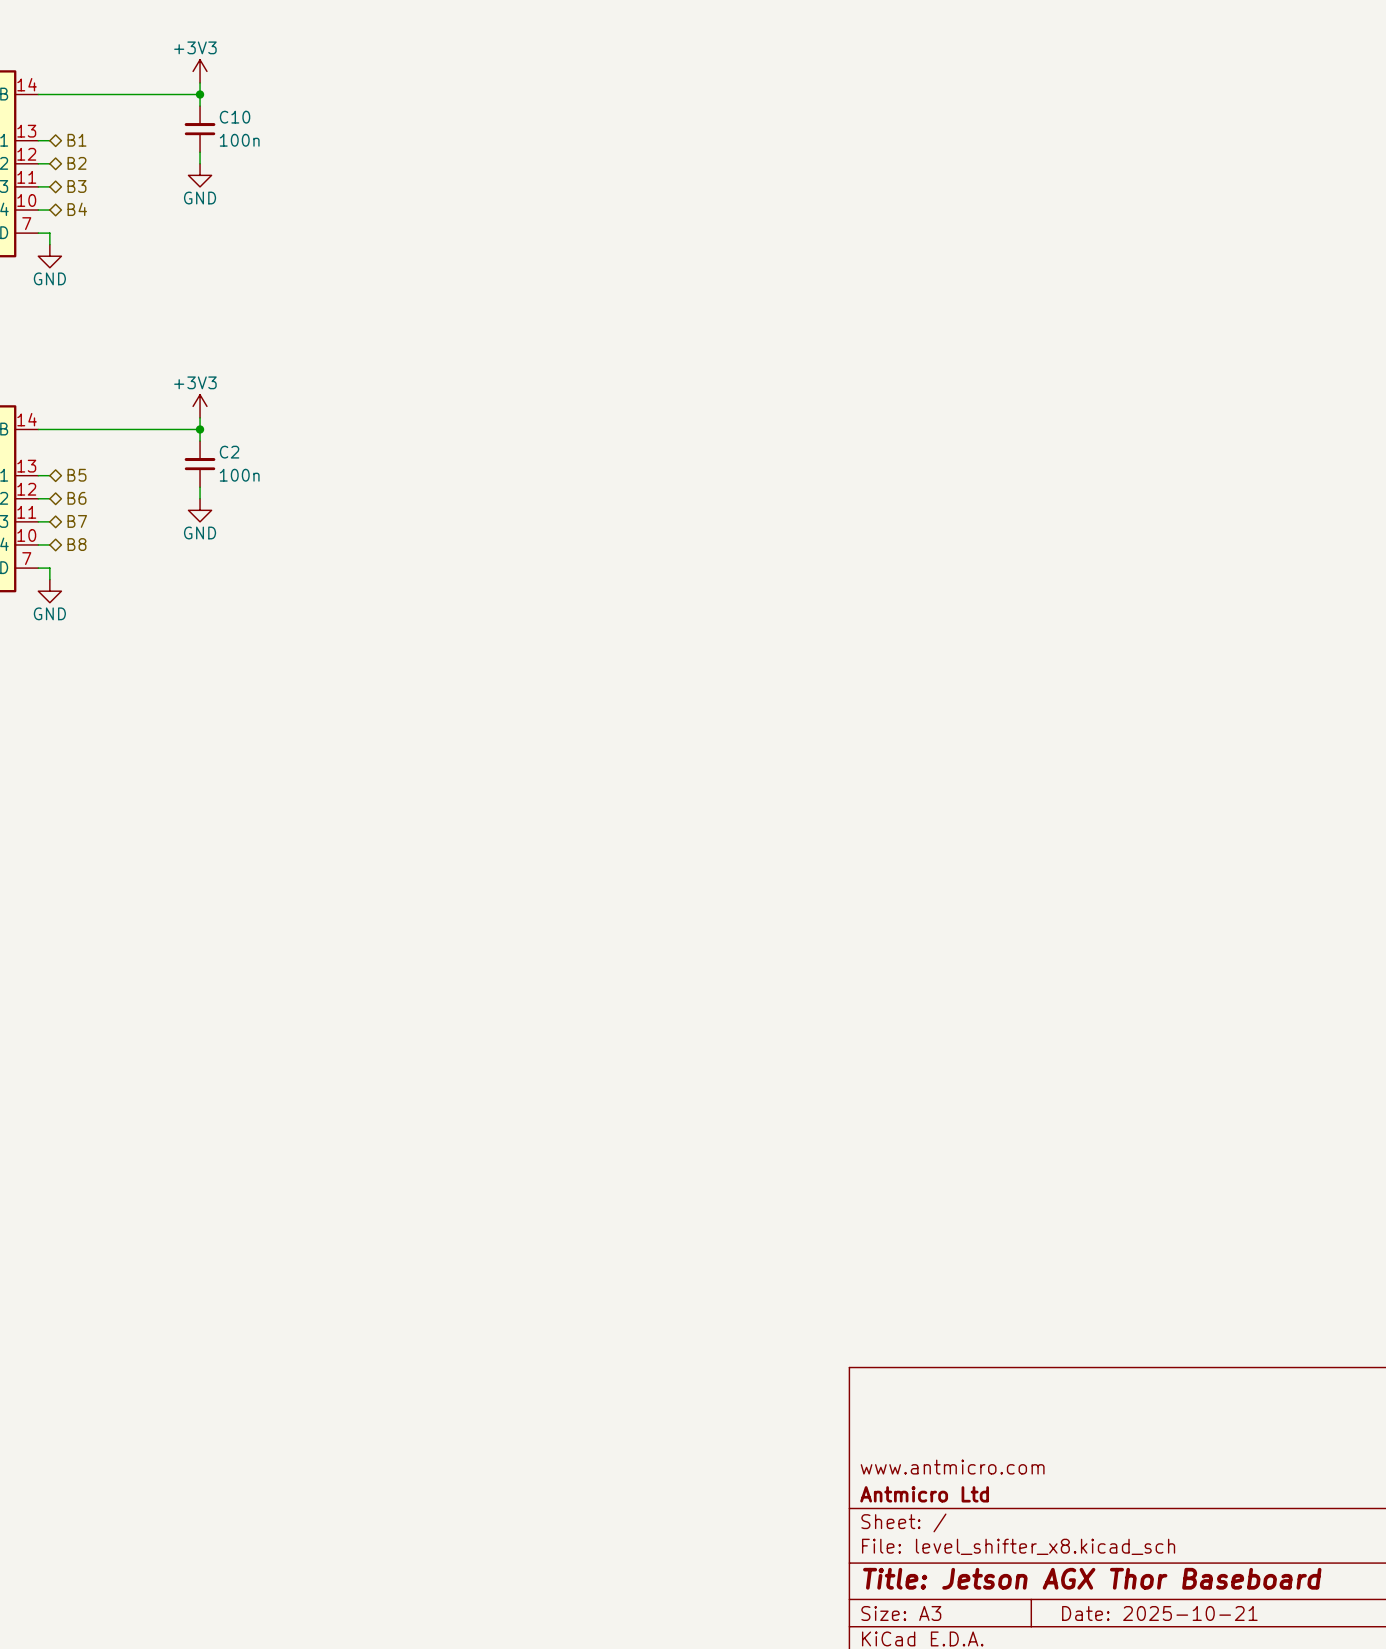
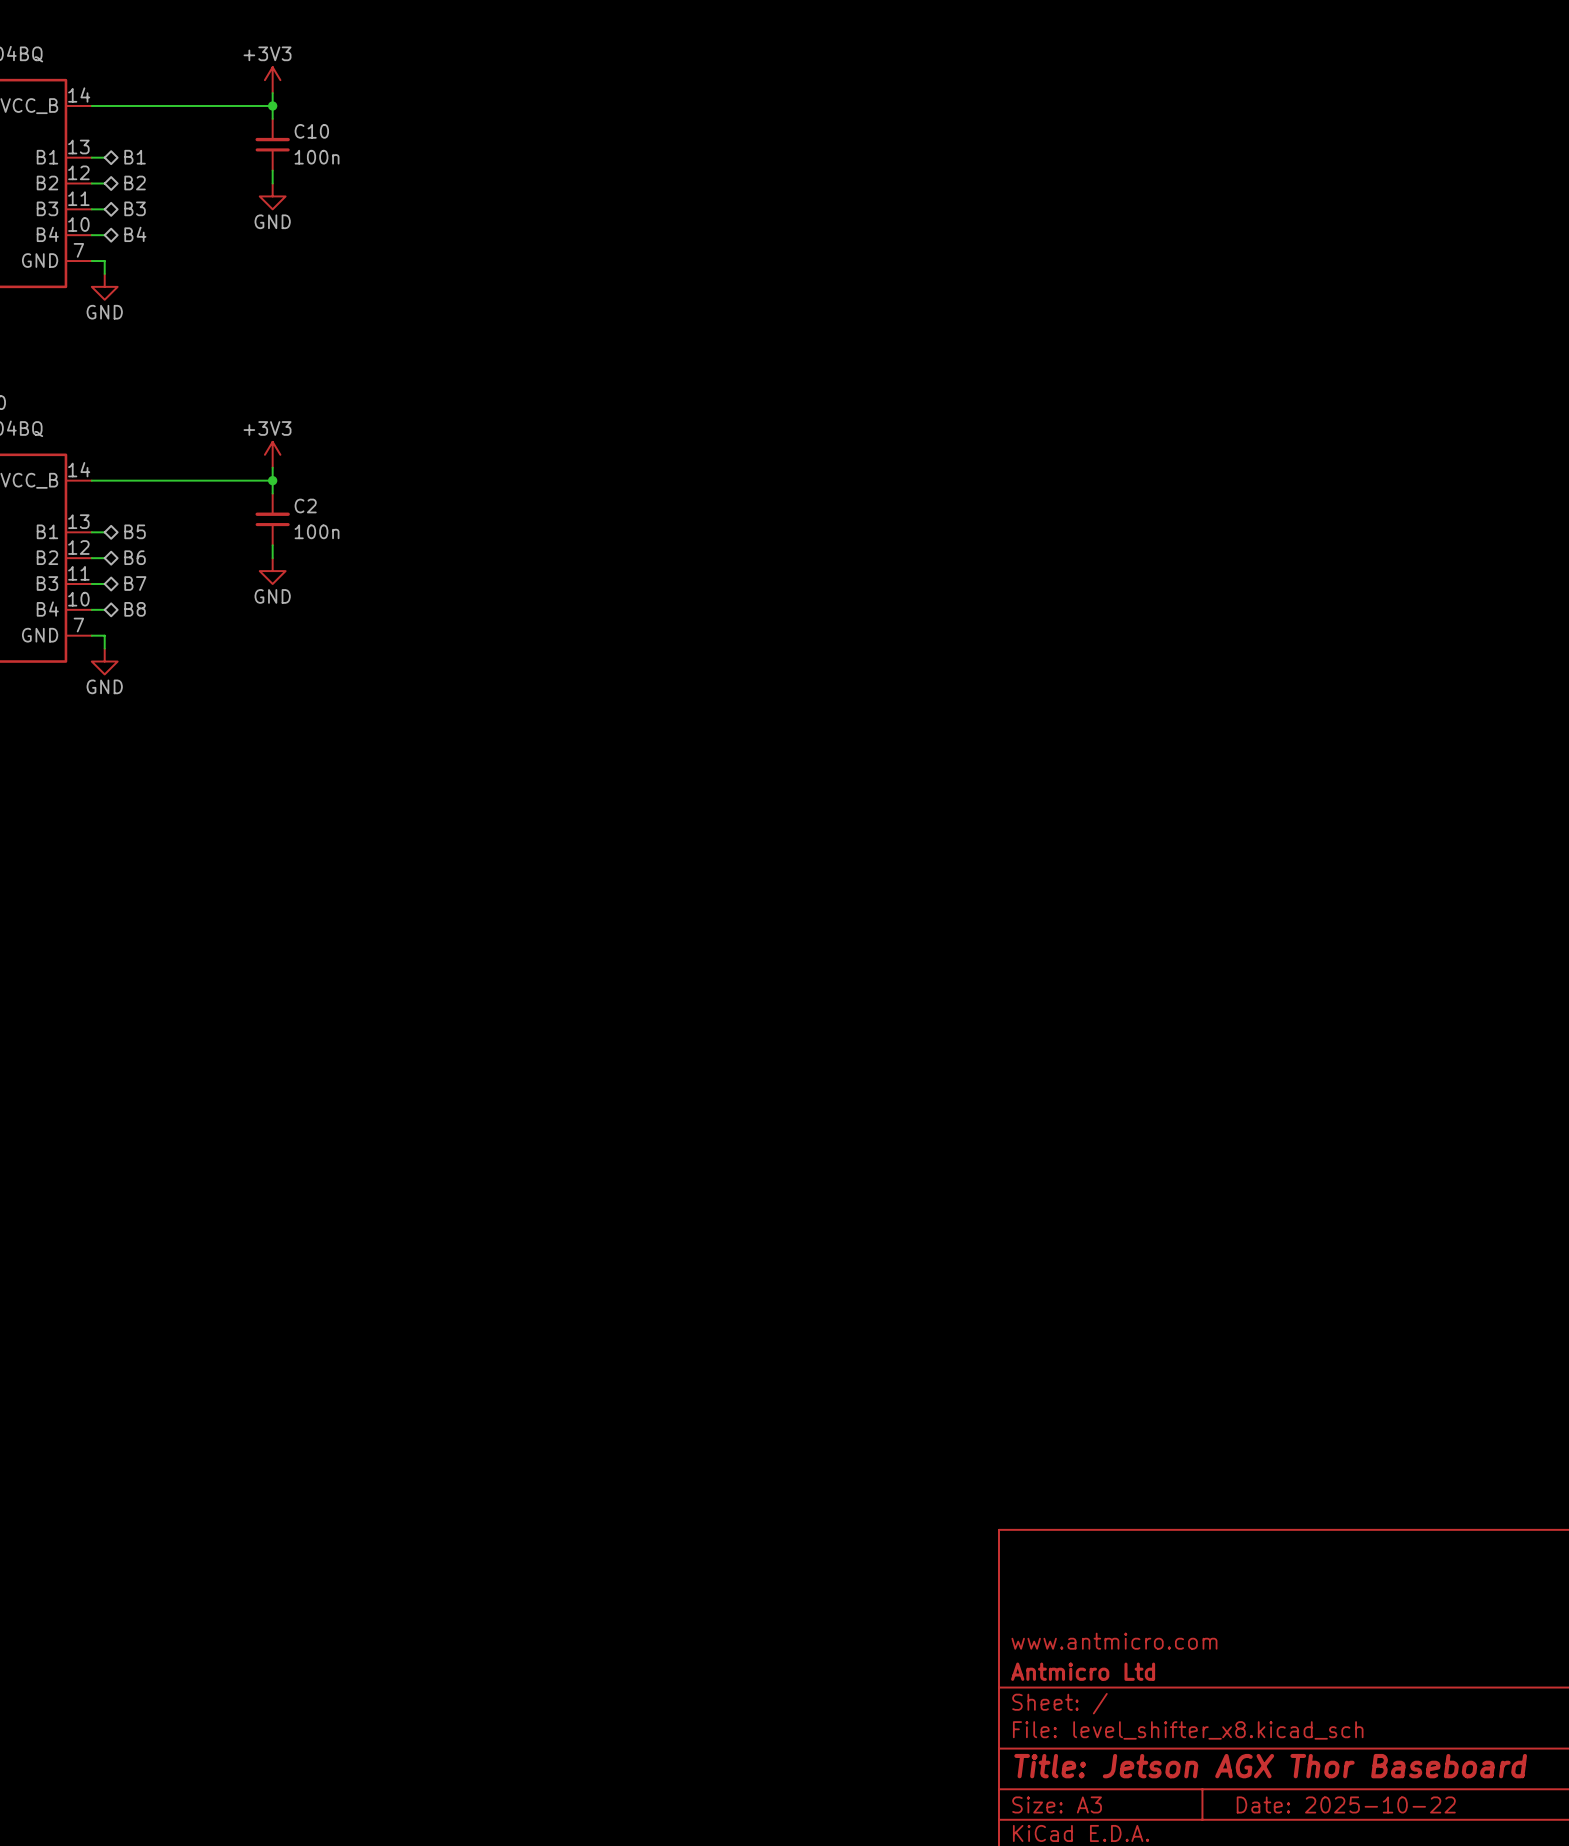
title block: Date: 2025-10-21 (1159, 1613) -> Date: 2025-10-22 (1346, 1804)

